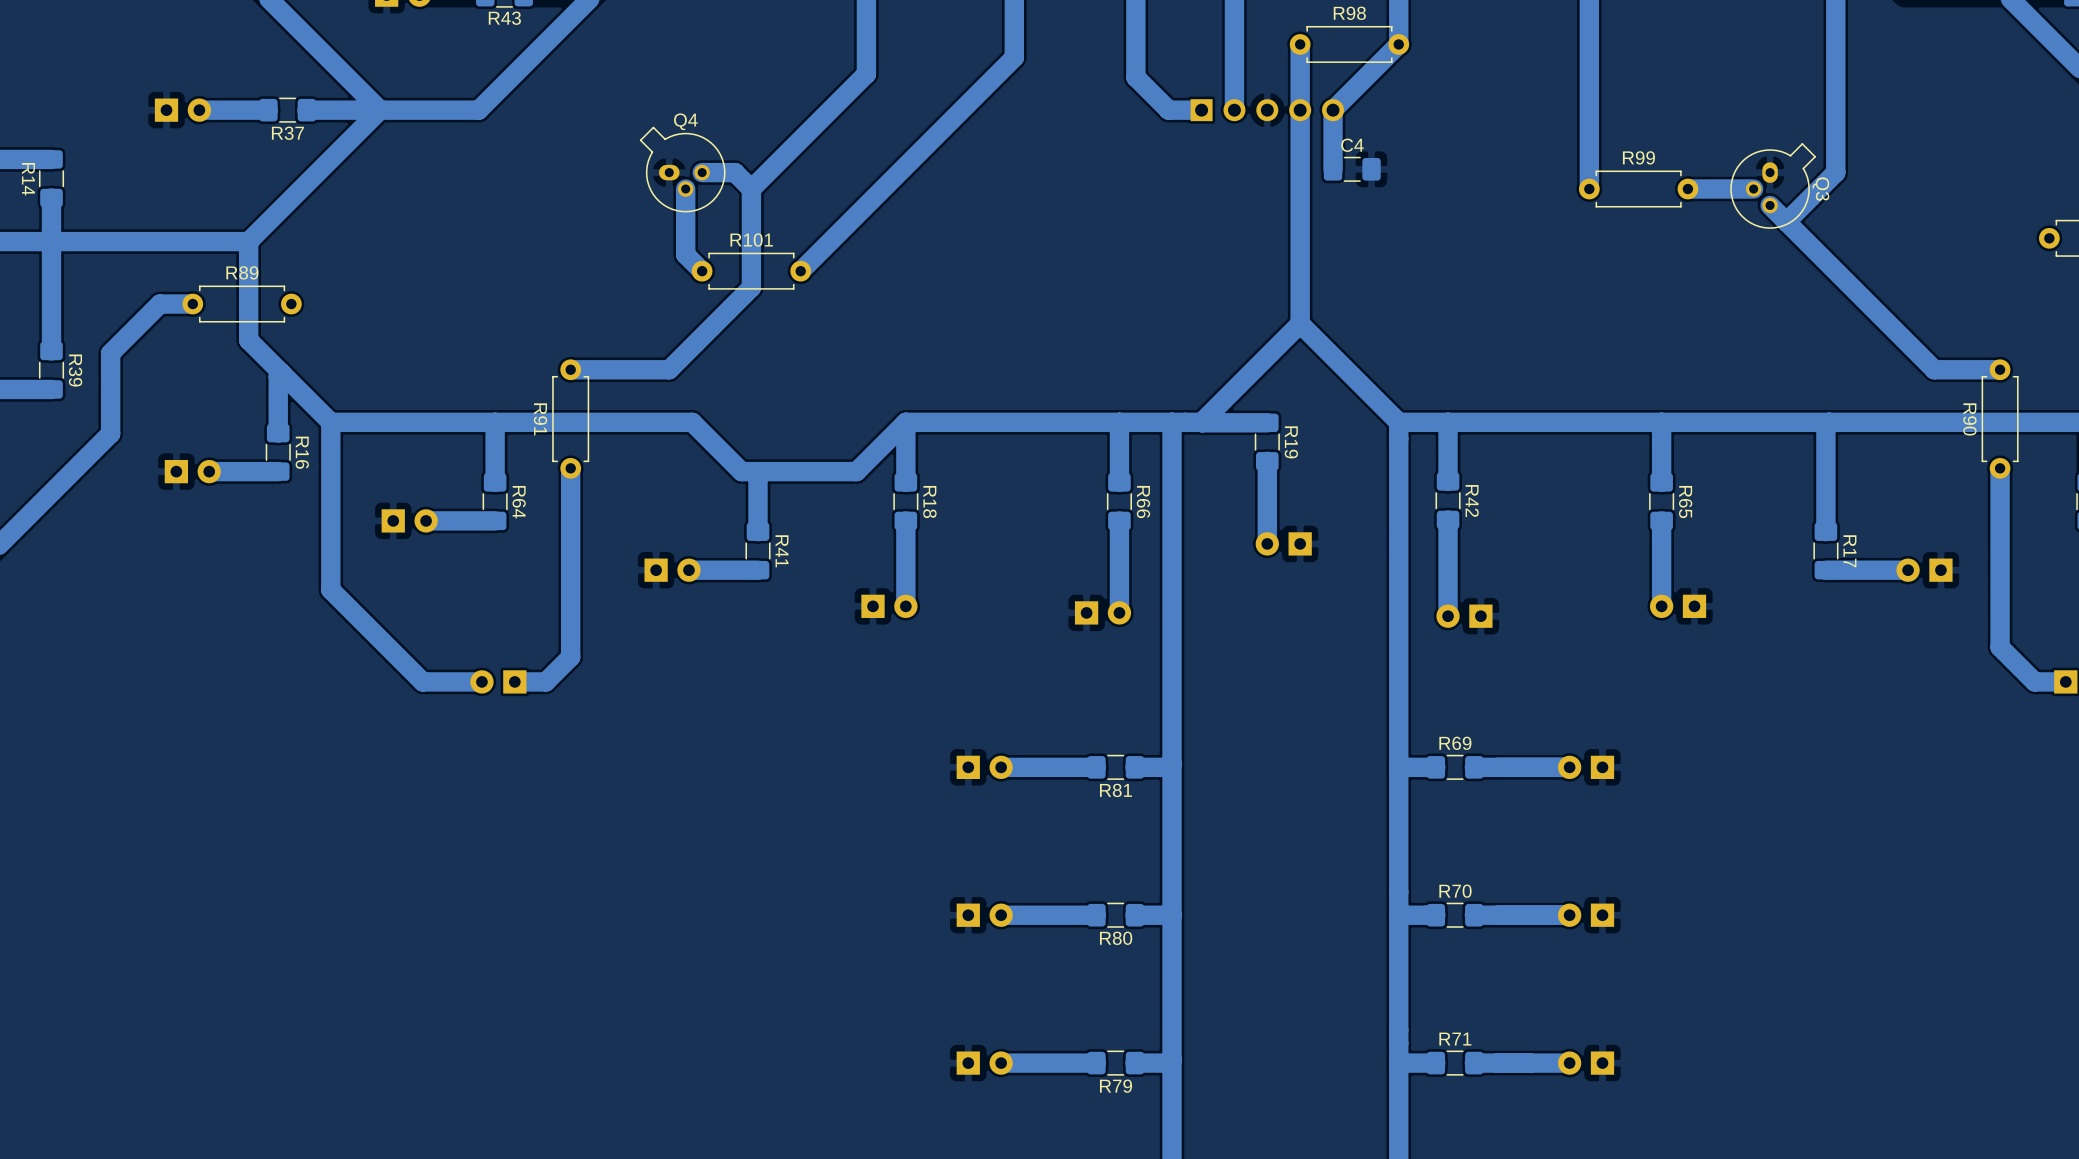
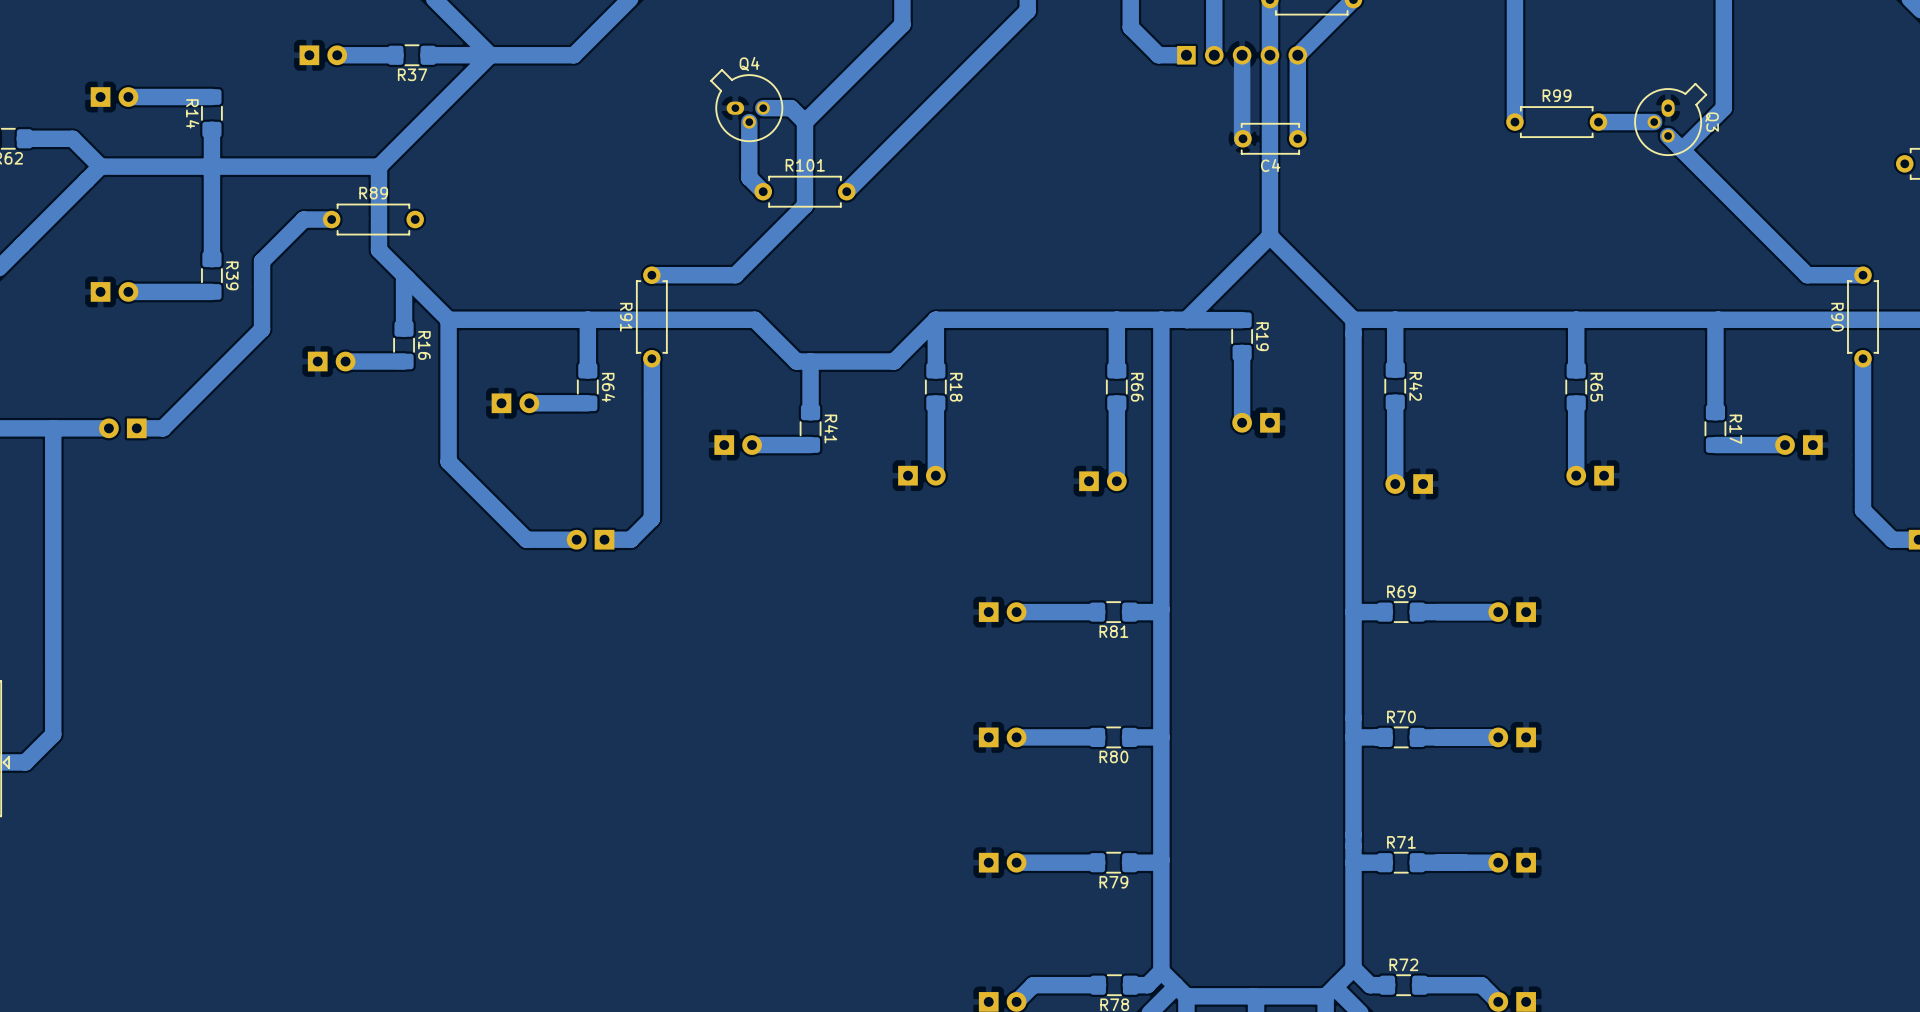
track: none -> (1242, 55) (1242, 138)
C4 name position: C4 (1352, 145) -> C4 (1270, 165)
C4 footprint: [1323, 156, 1381, 182] -> [1234, 123, 1307, 155]
track: none -> (1297, 105) (1297, 138)

